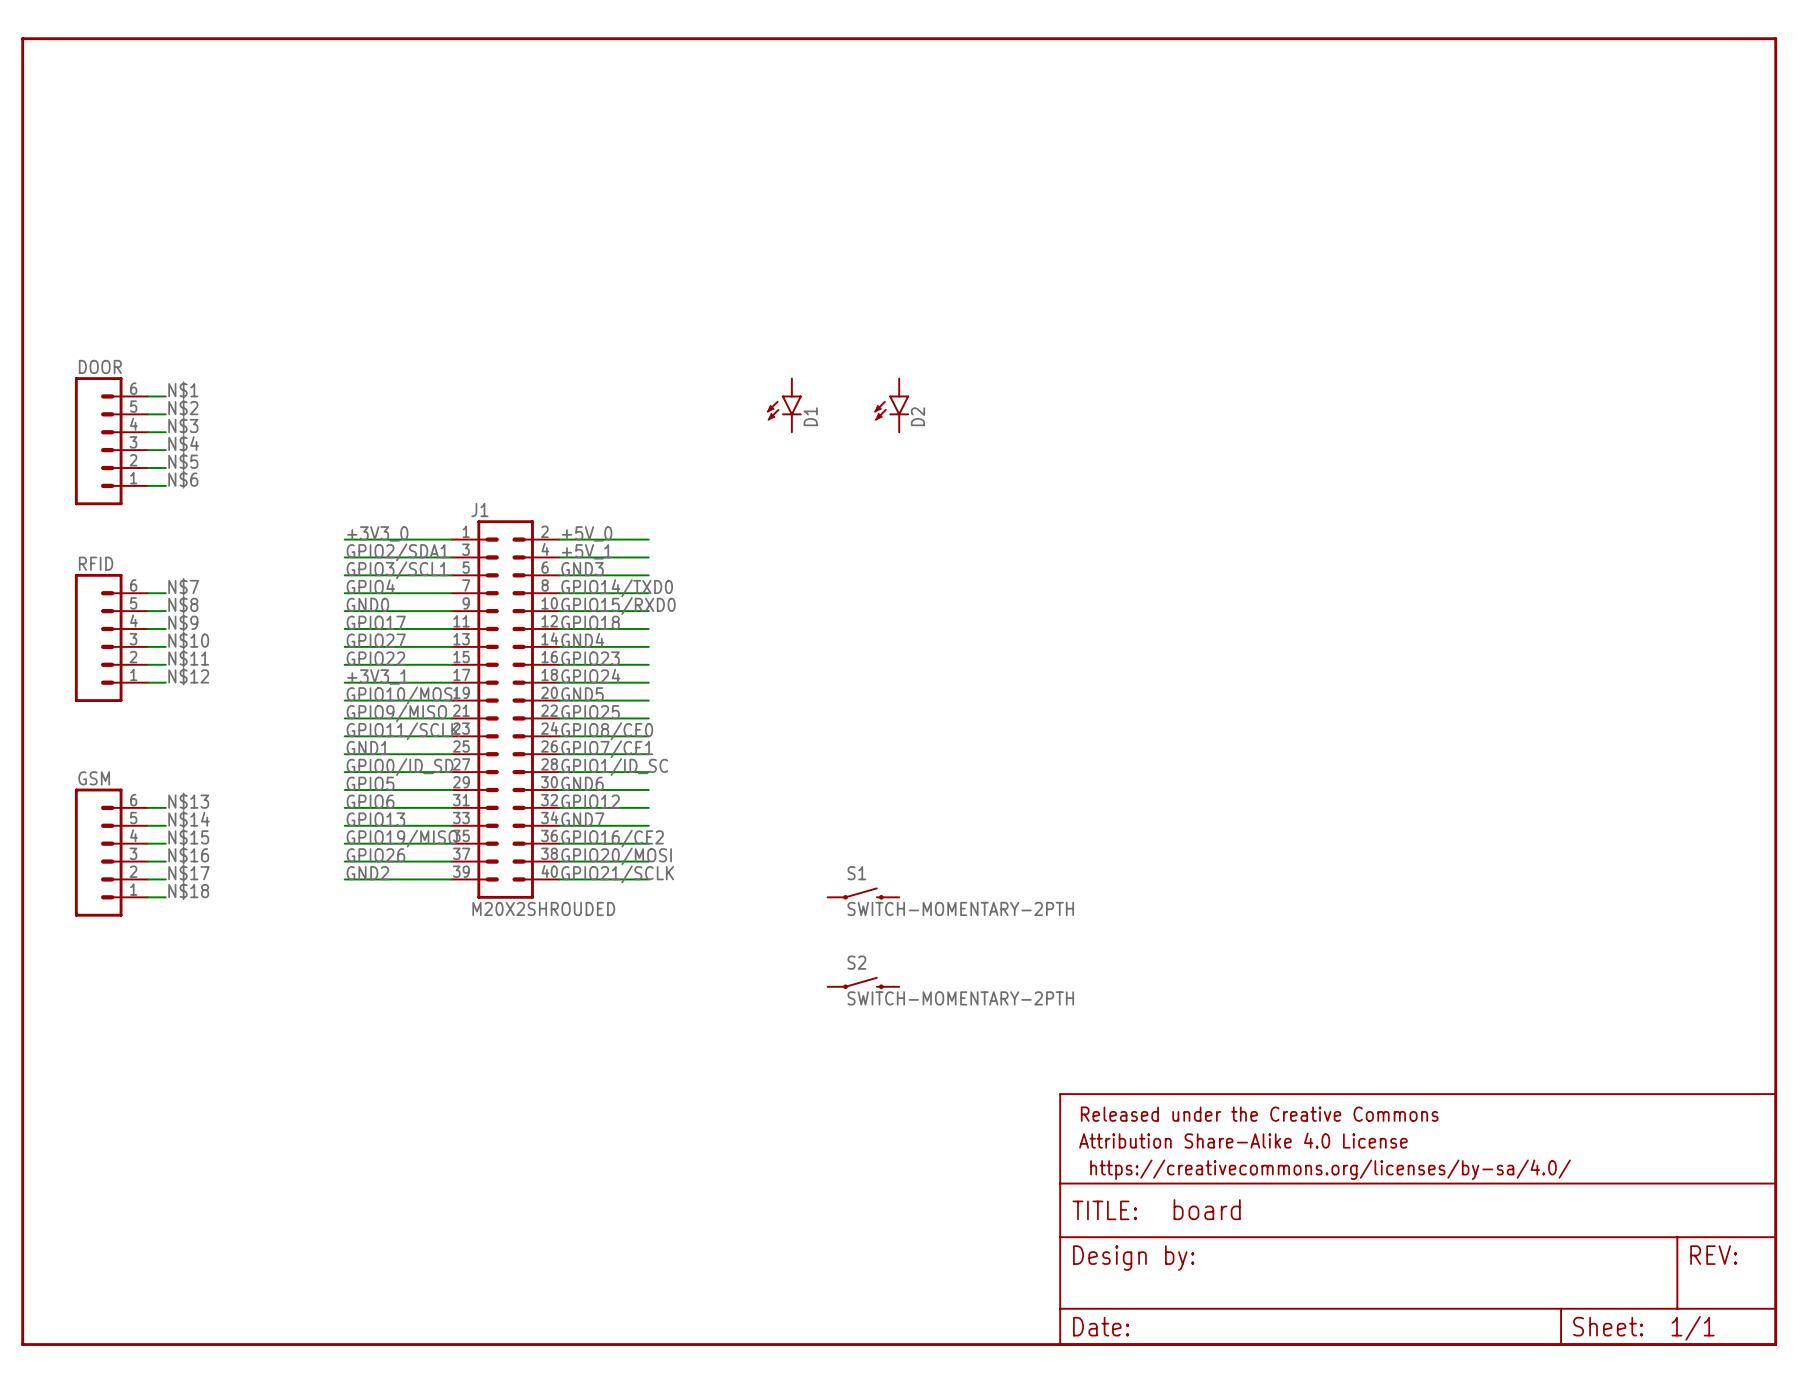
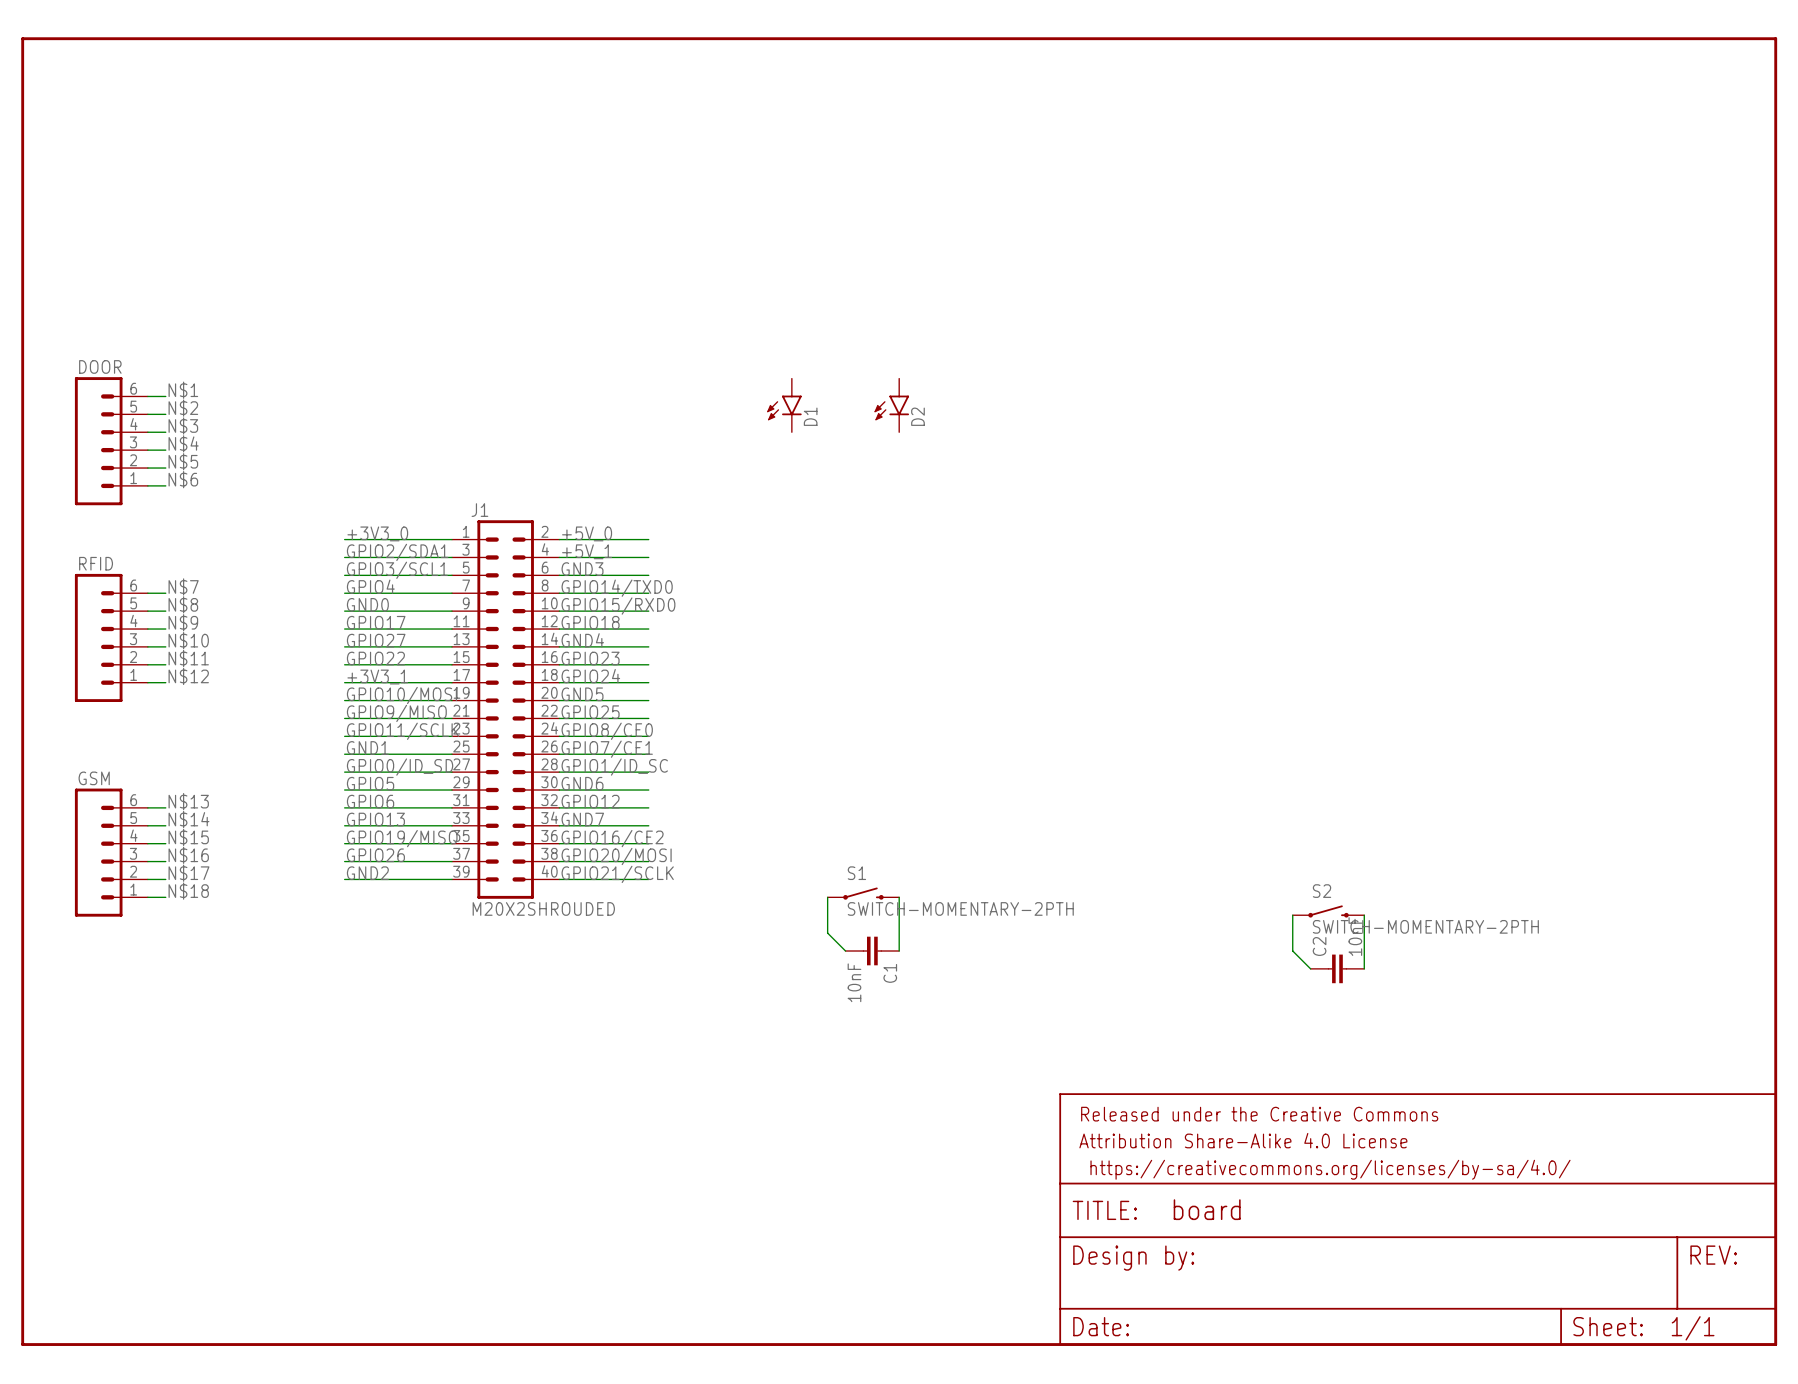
wire: none -> (827, 897) (827, 933) (845, 951)
wire: none -> (899, 897) (899, 951)
wire: none -> (1292, 915) (1292, 951) (1310, 968)
wire: none -> (1364, 915) (1364, 968)
C1: none -> 10nF (872, 951)
C2: none -> 10nF (1337, 968)
S2 position: (863, 983) -> (1328, 911)

